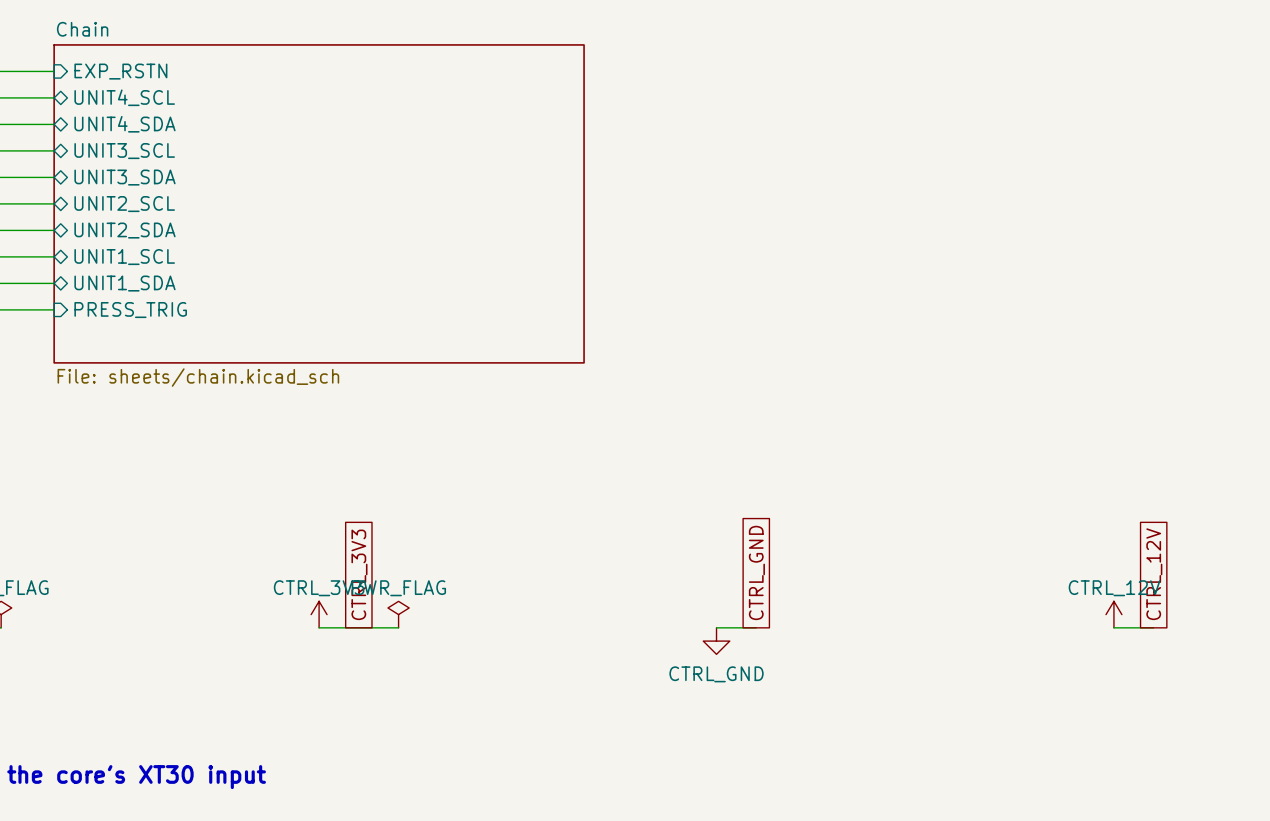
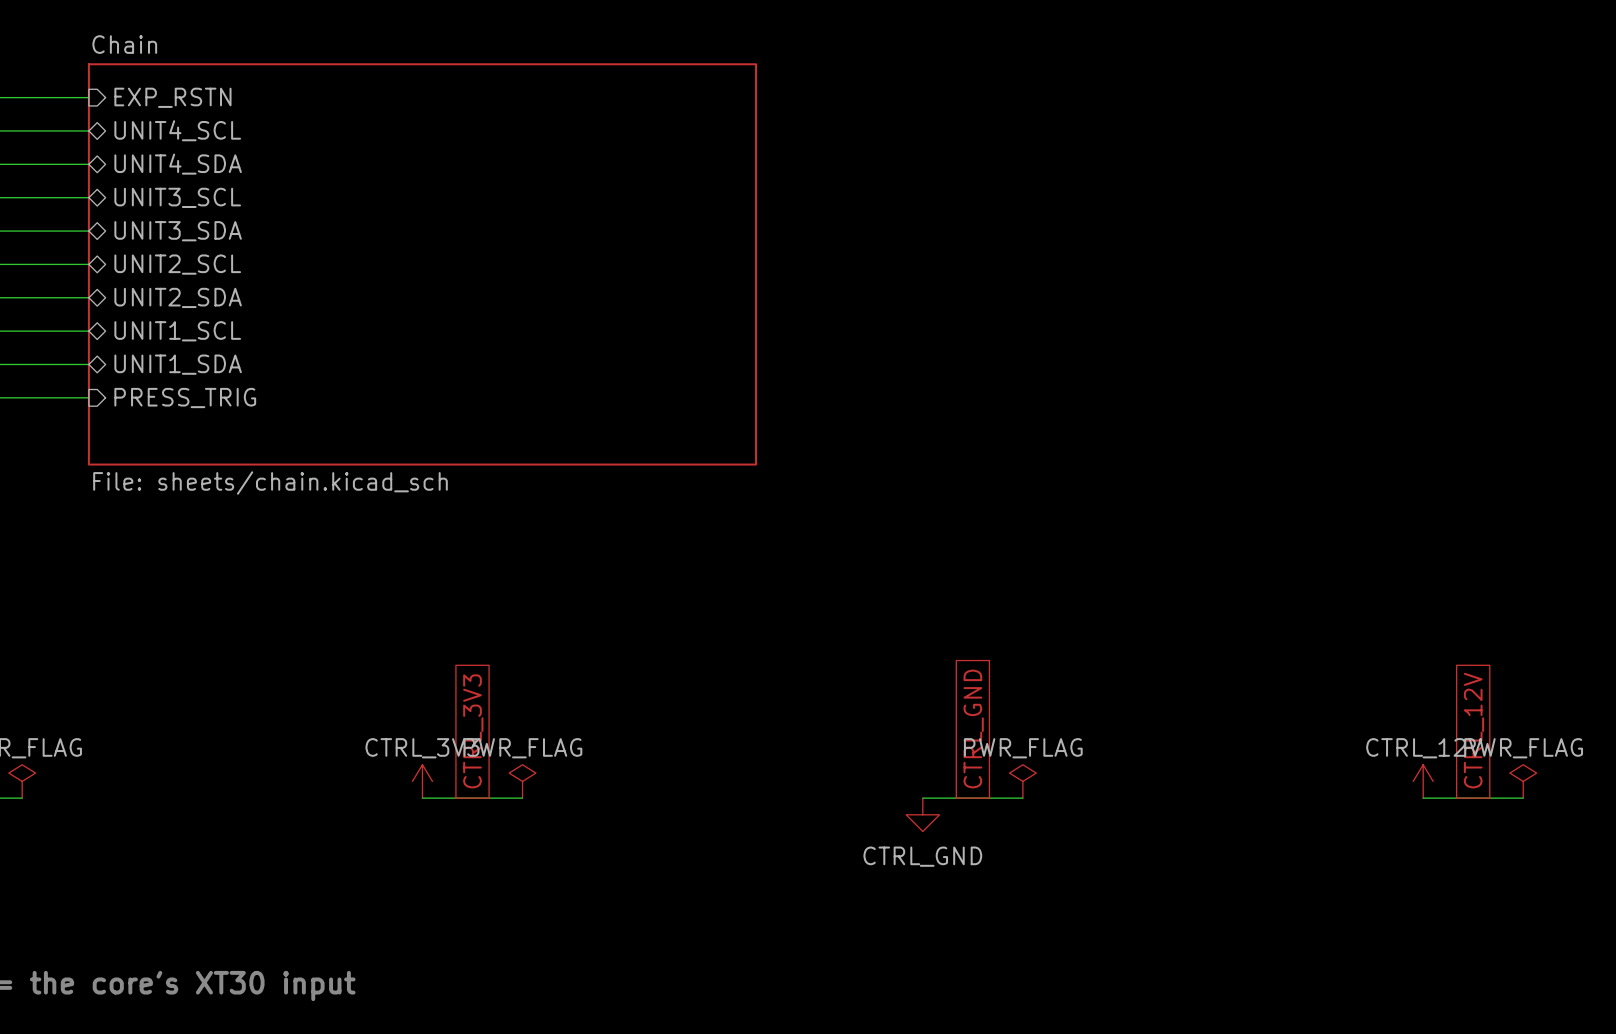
power symbol: none -> PWR_FLAG (1022, 781)
power symbol: none -> PWR_FLAG (1523, 781)
wire: none -> (972, 798) (1022, 798)
wire: none -> (1473, 798) (1523, 798)

